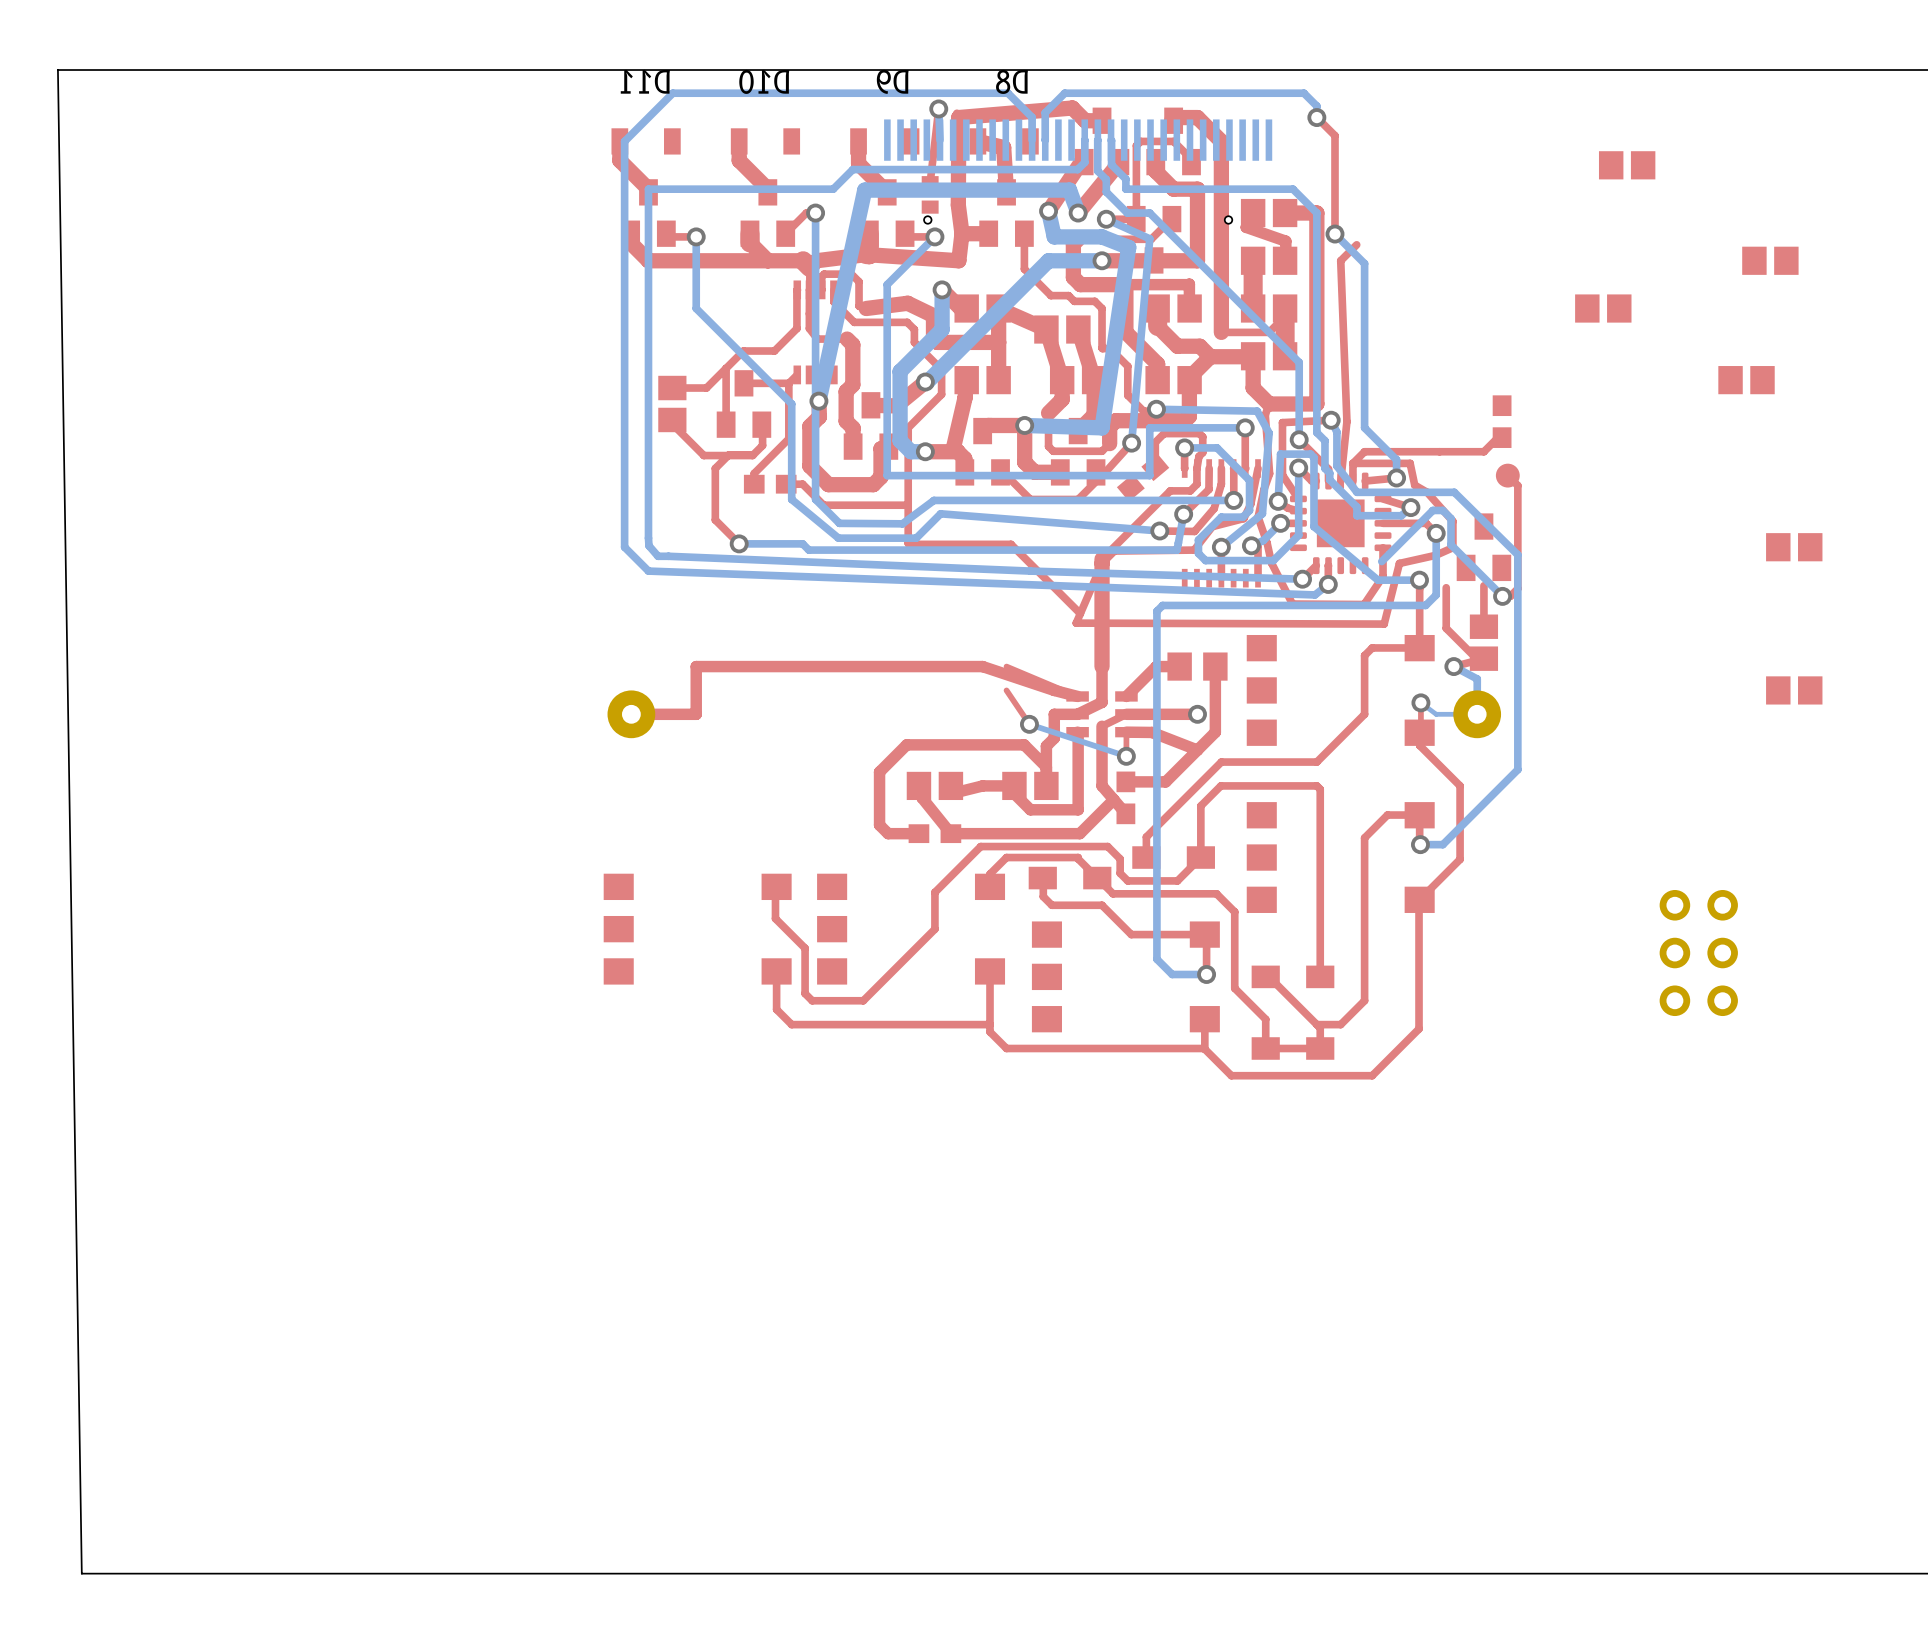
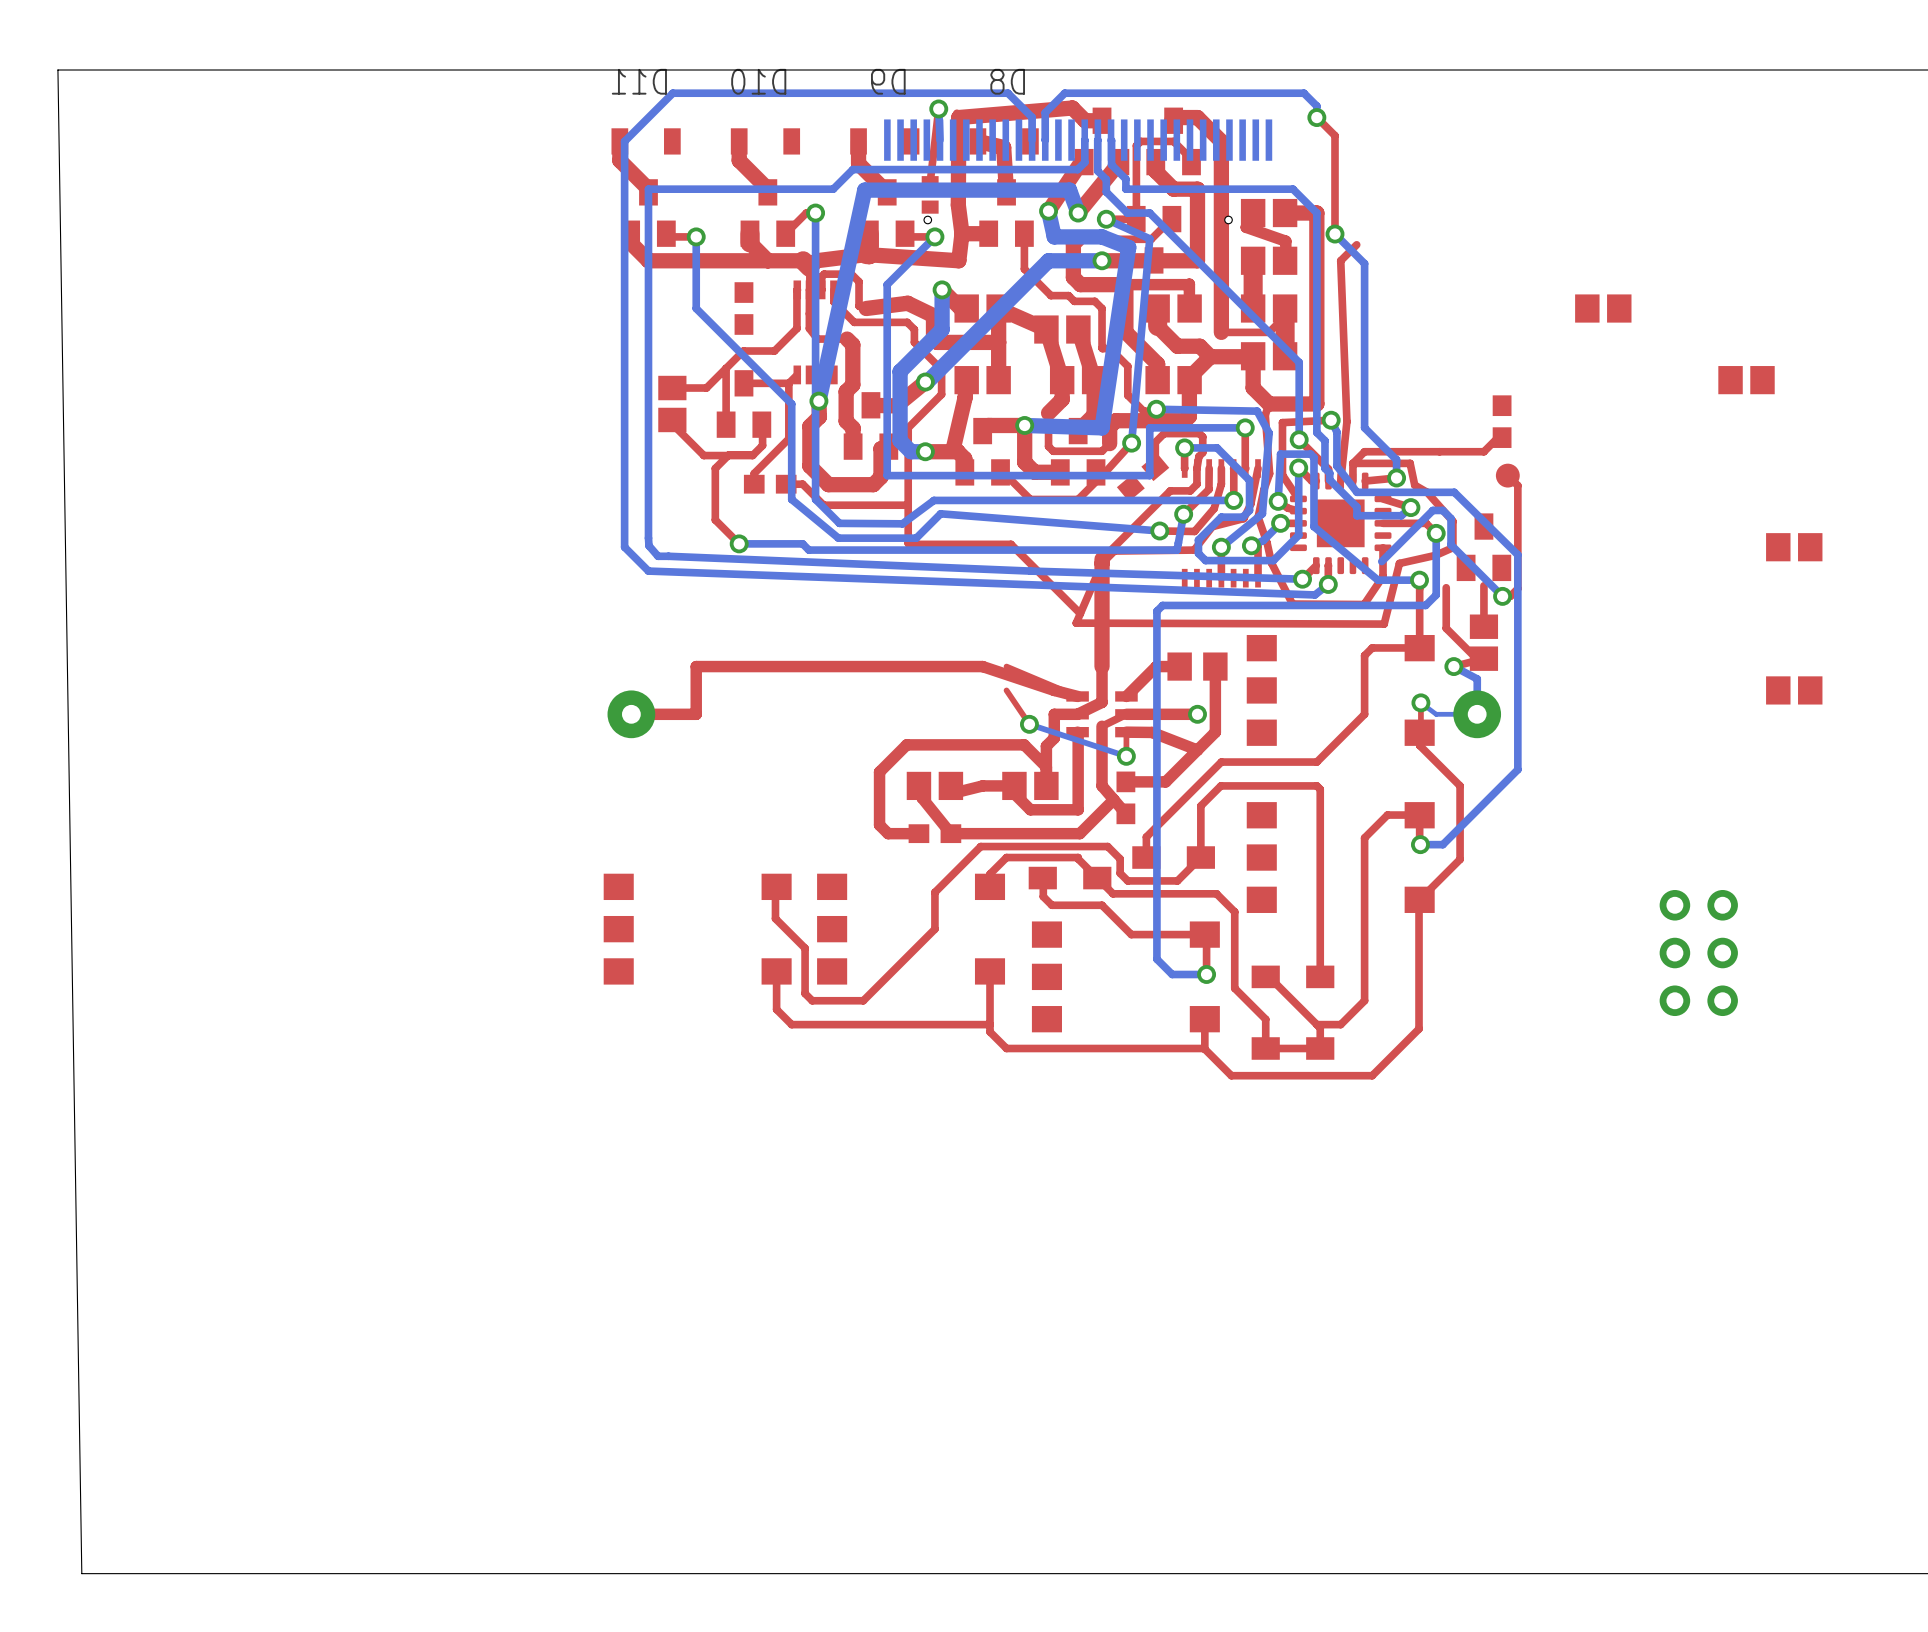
part: (1627, 165) -> none
part: (1770, 260) -> none
part: none -> (743, 308)

